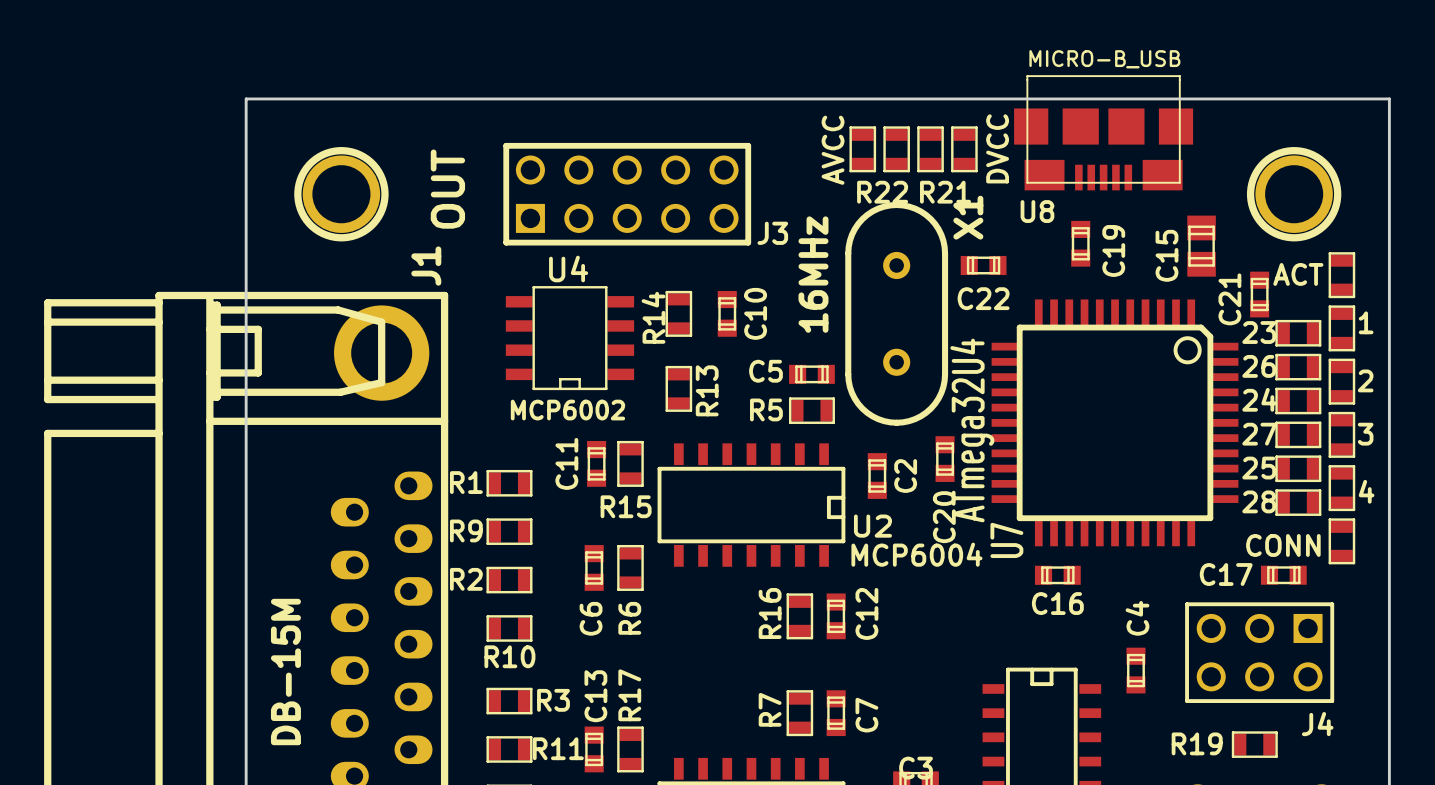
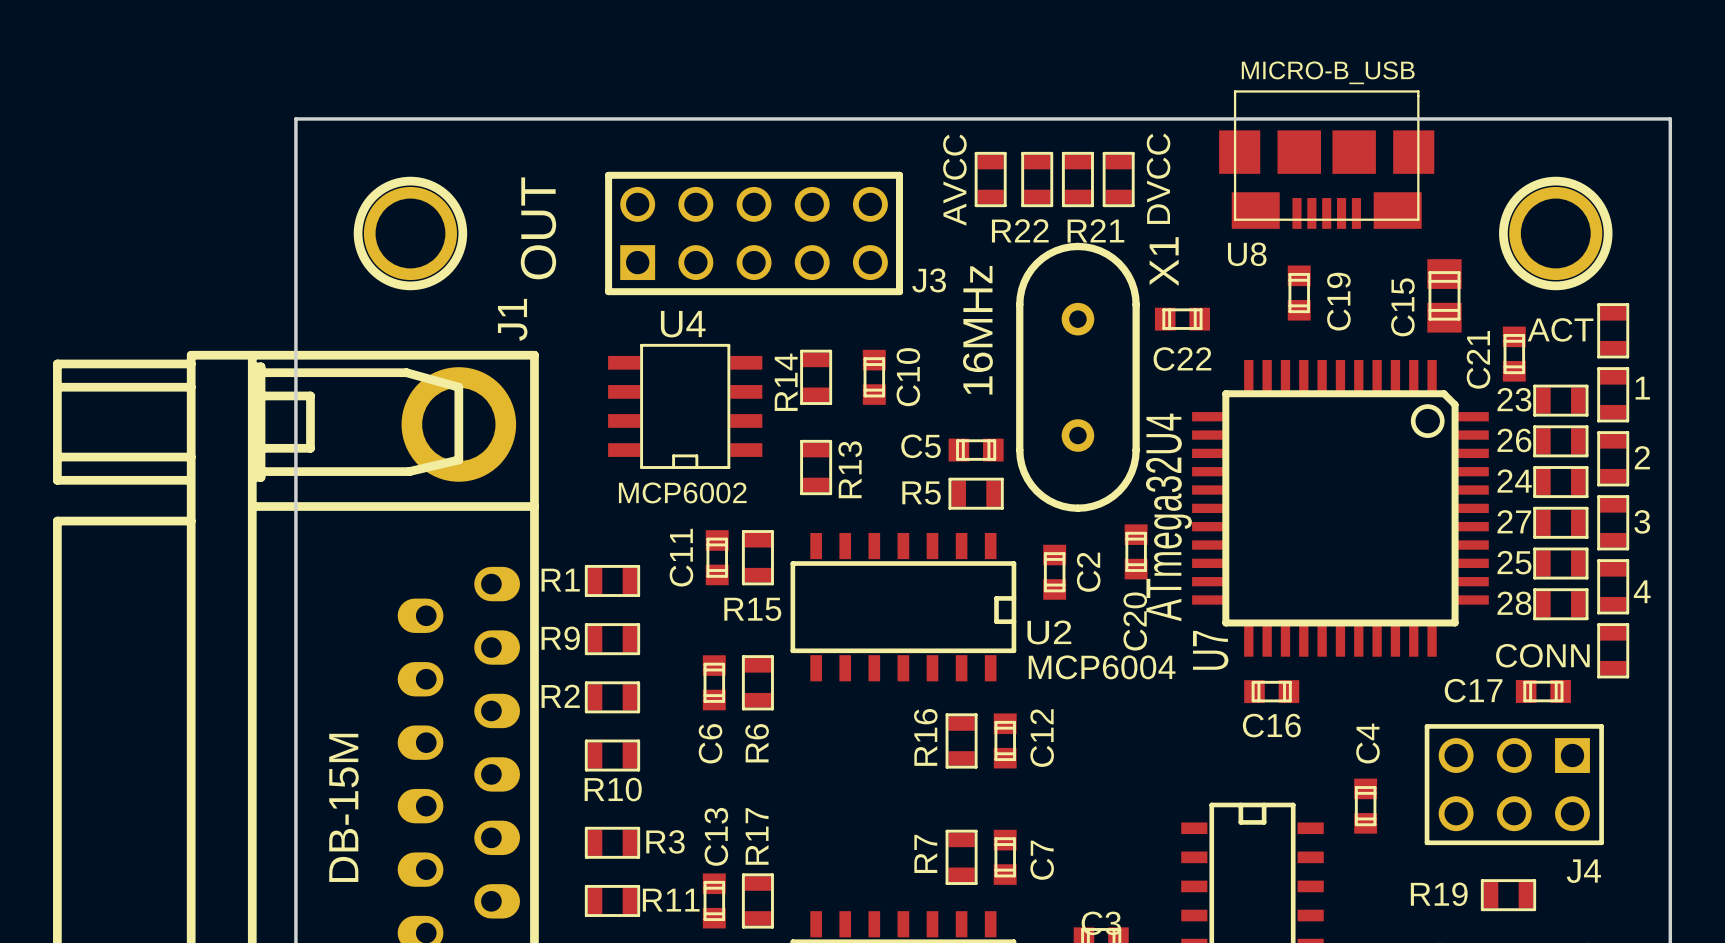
AVCC: none -> (990, 179)
DVCC: (964, 149) -> none
AVCC name: AVCC (833, 150) -> R22 (1020, 230)
R22 name: R22 (882, 192) -> R21 (1095, 230)
R21 name: R21 (945, 192) -> DVCC (1158, 178)

